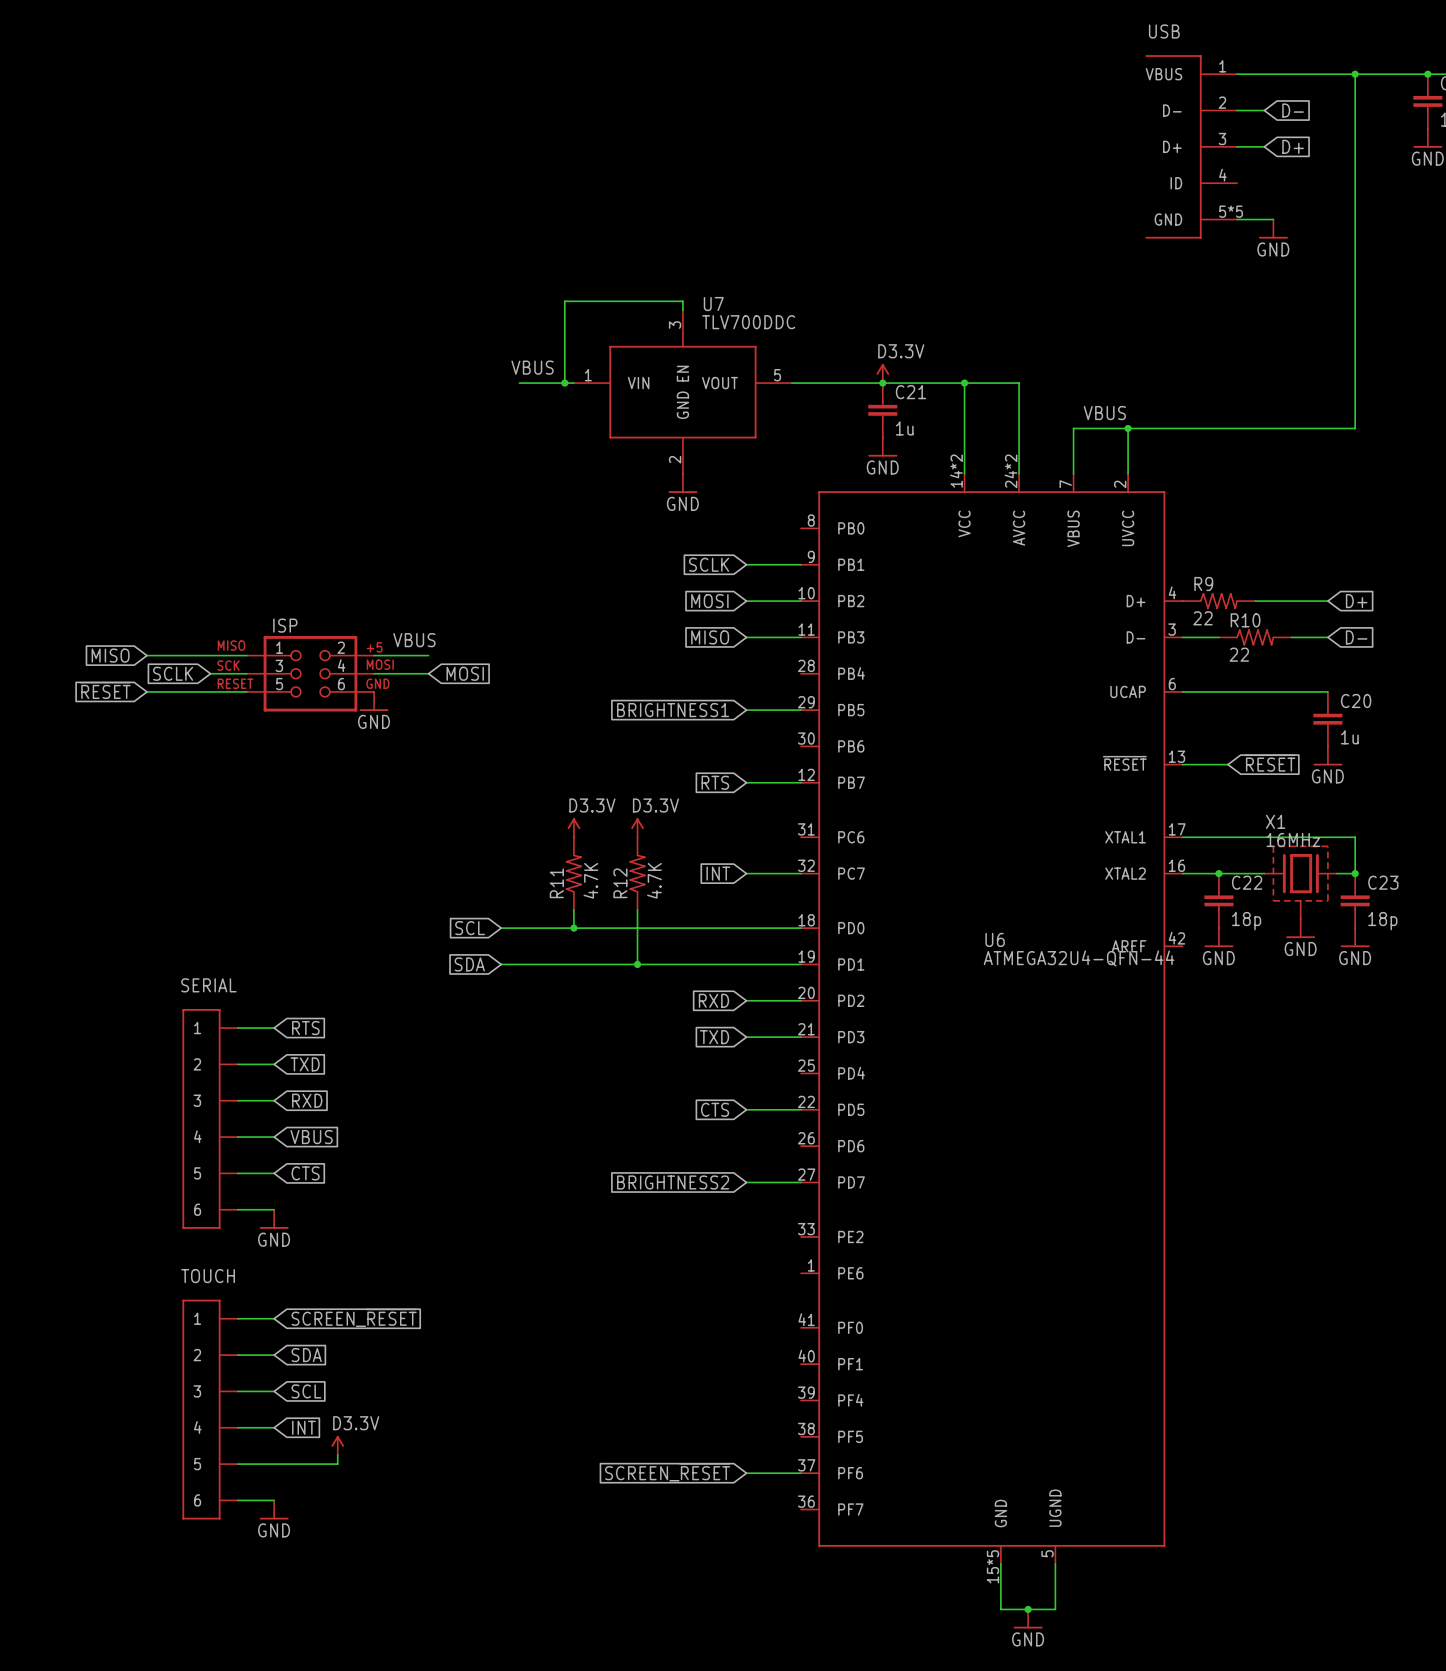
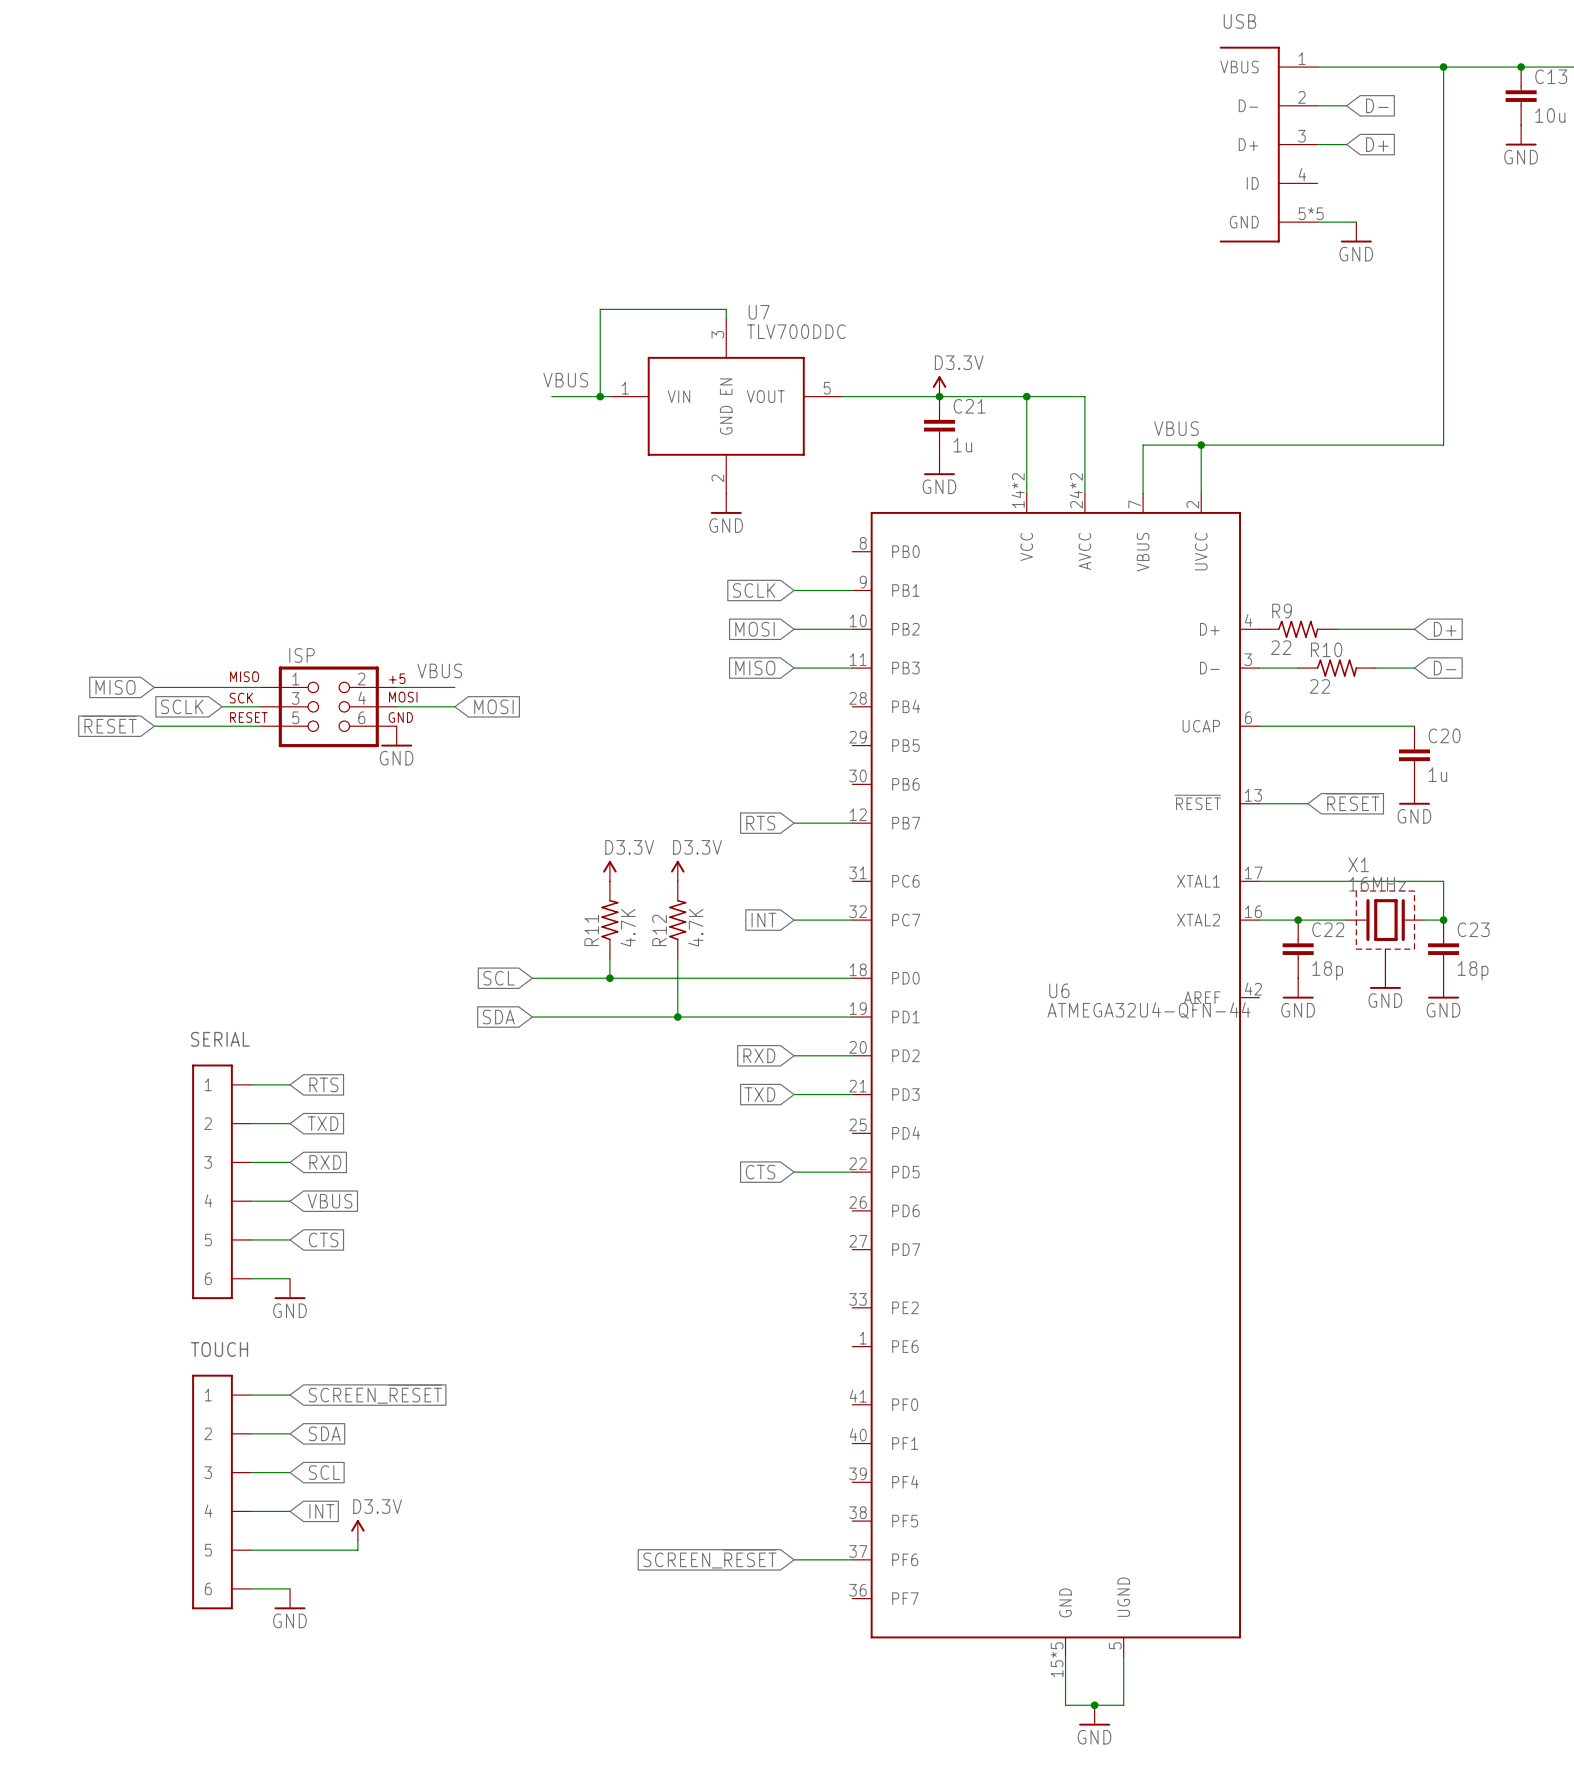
global label: BRIGHTNESS1 (673, 710) -> none
wire: (746, 710) (801, 710) -> none
global label: BRIGHTNESS2 (673, 1182) -> none
wire: (746, 1182) (801, 1182) -> none

